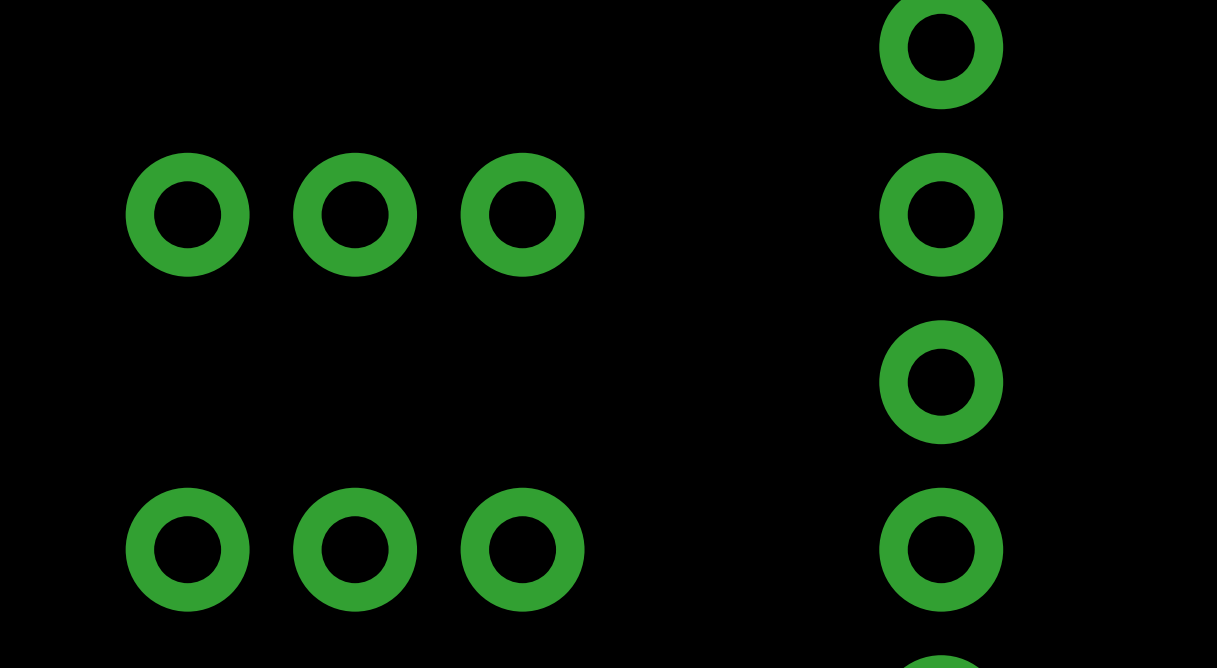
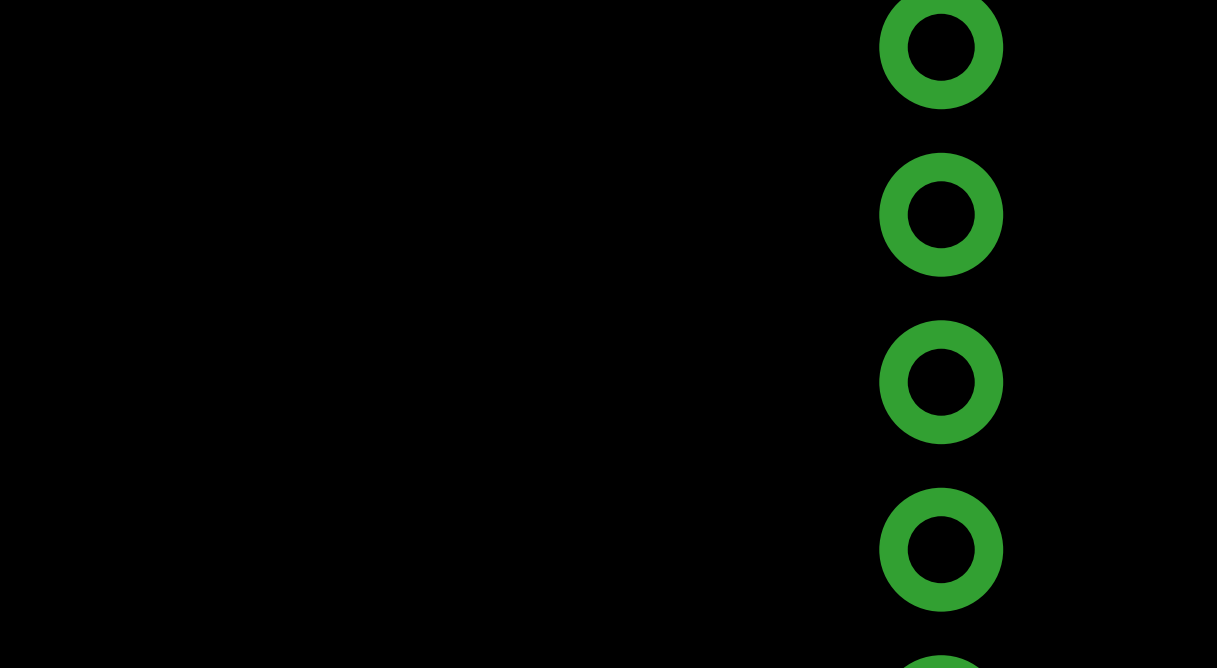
part: (355, 214) -> none
part: (355, 549) -> none

